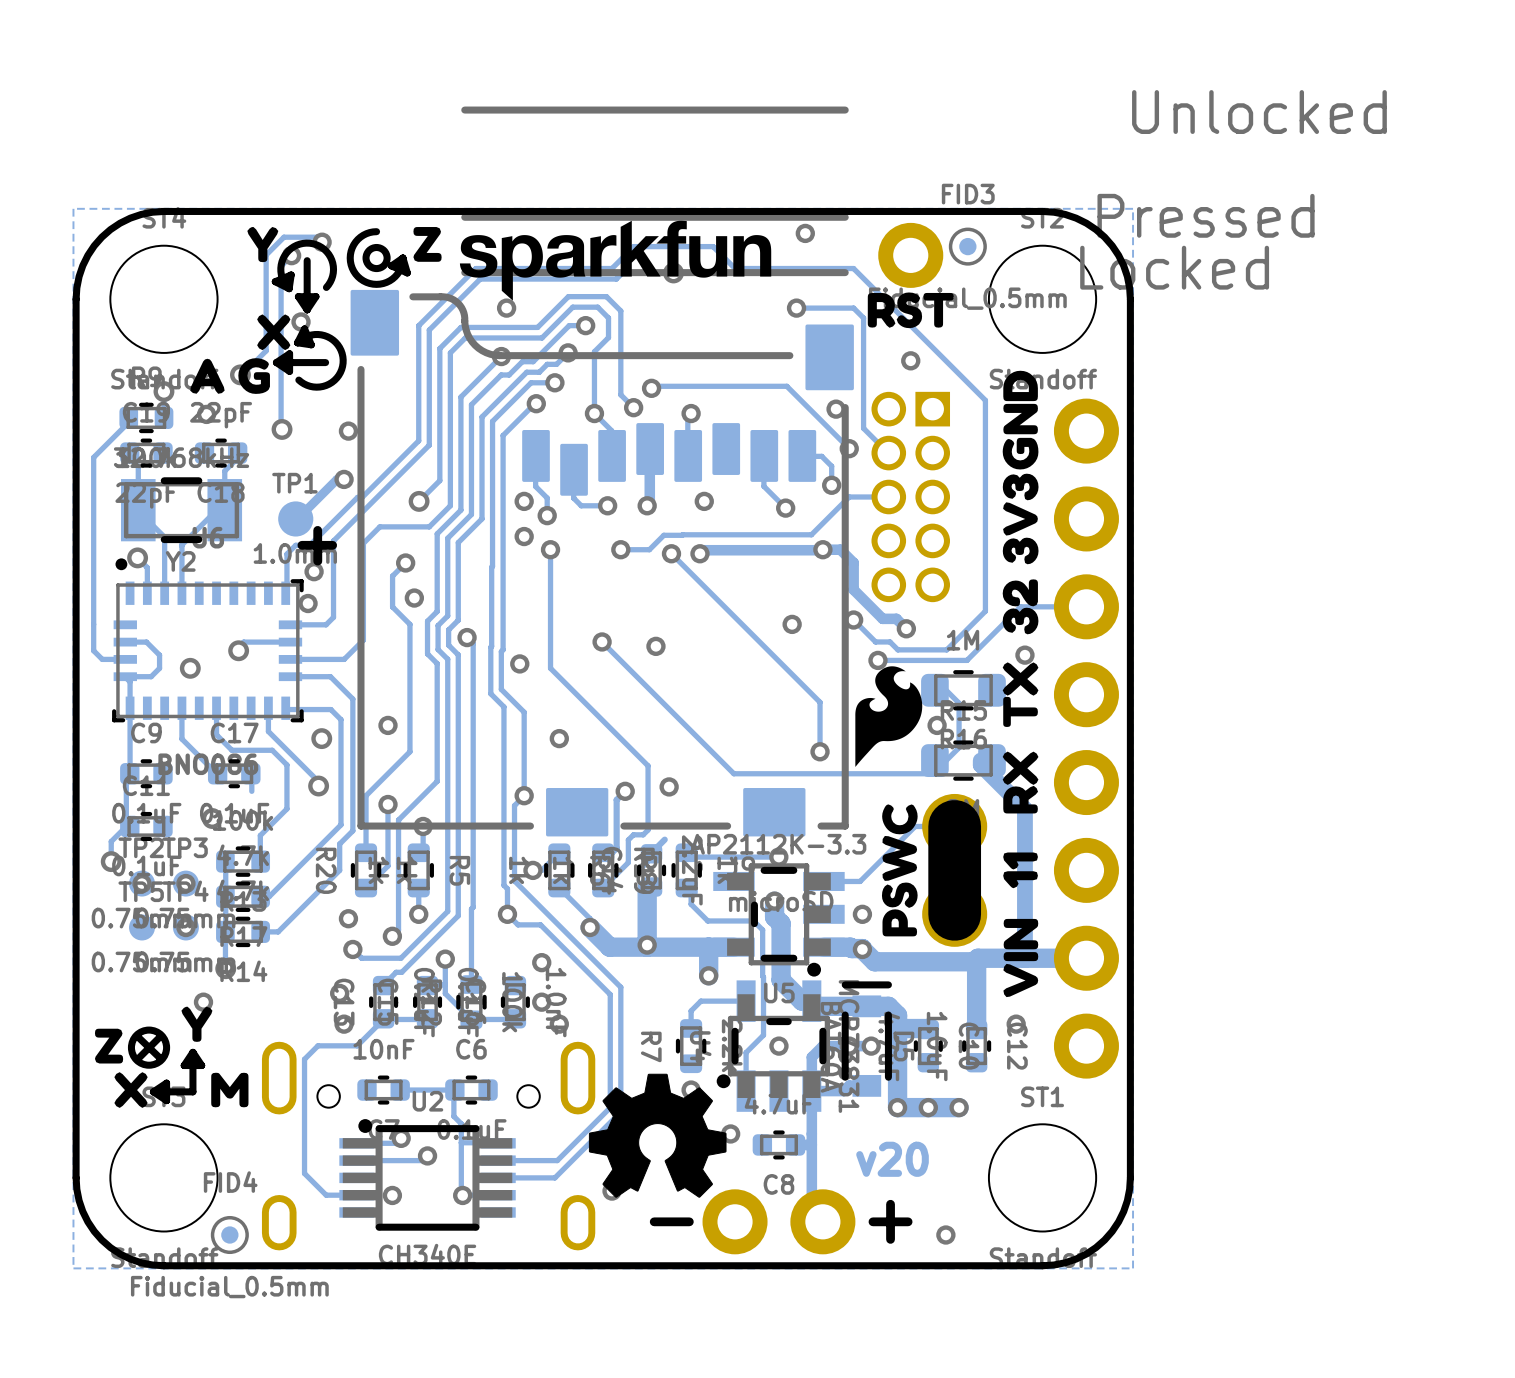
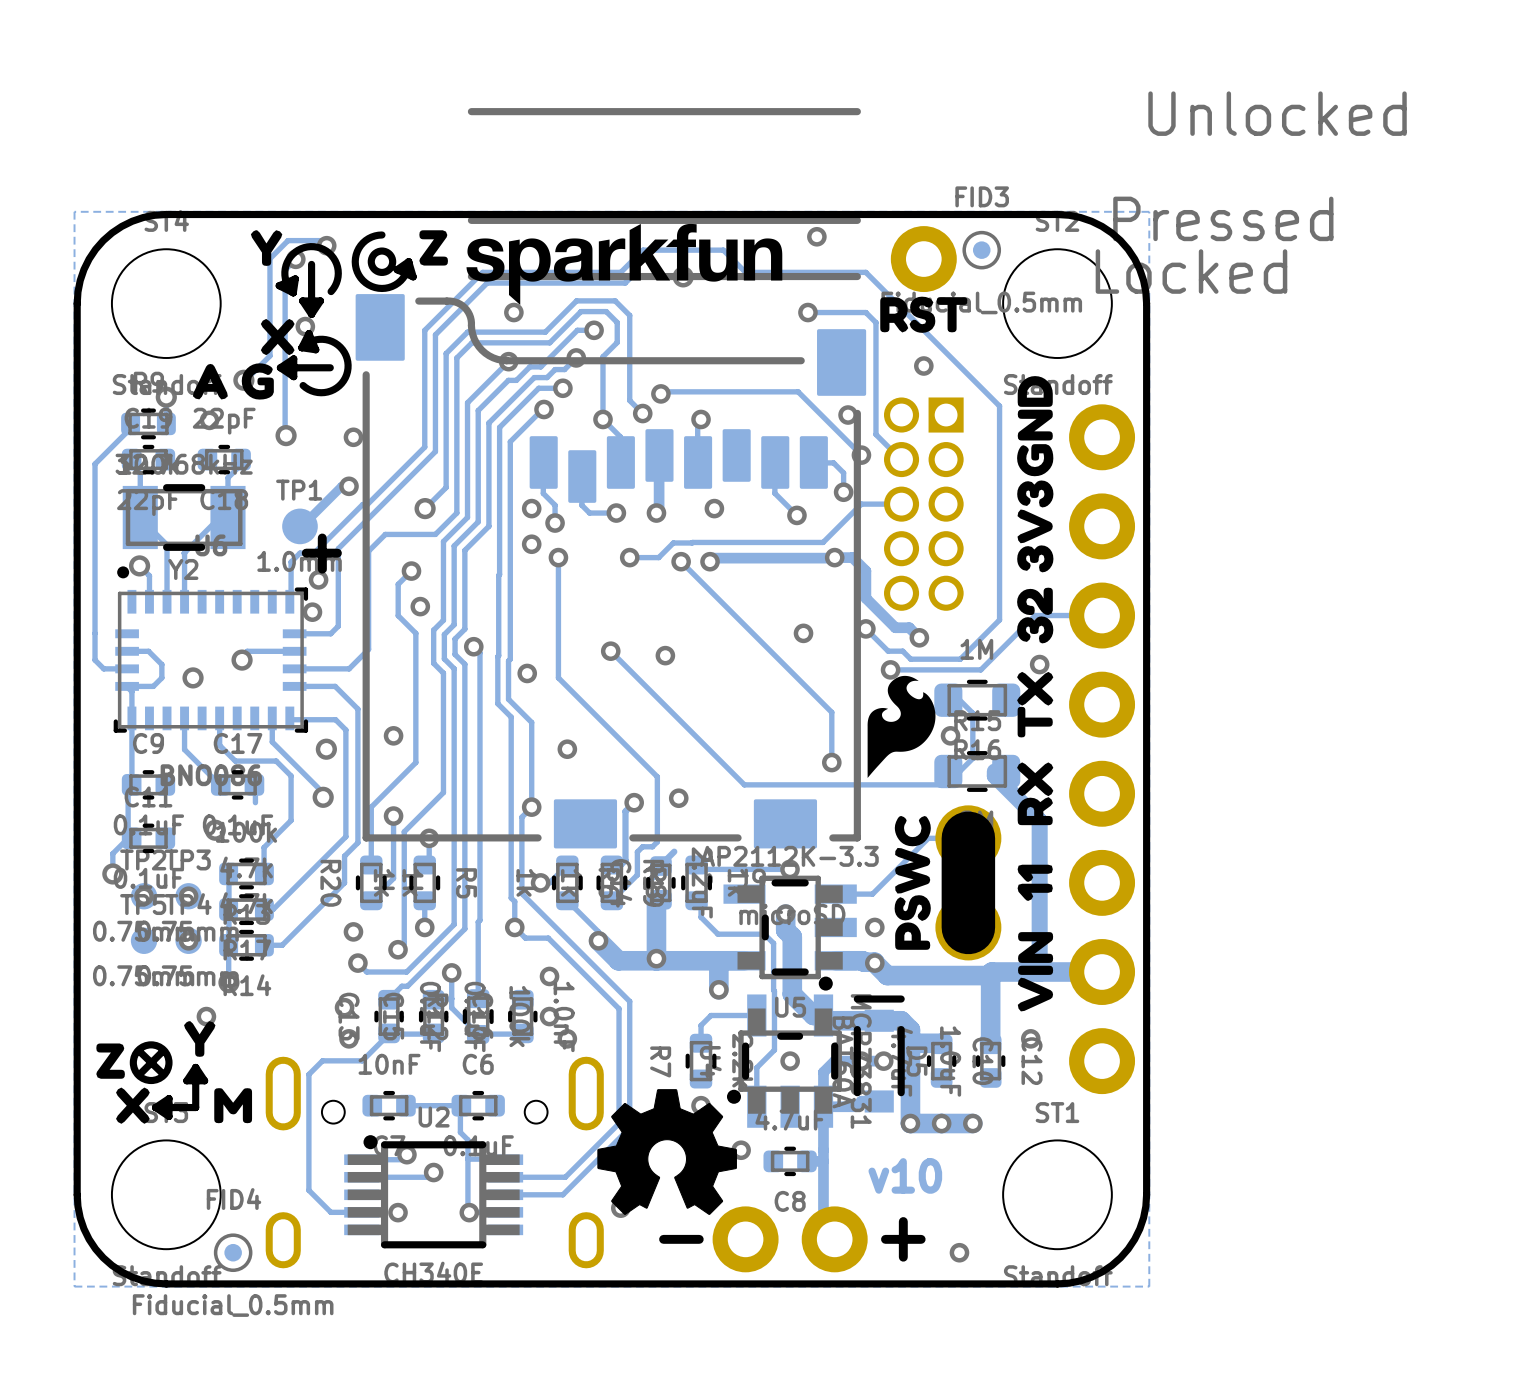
text: v20 (892, 1159) -> v10 (905, 1175)

